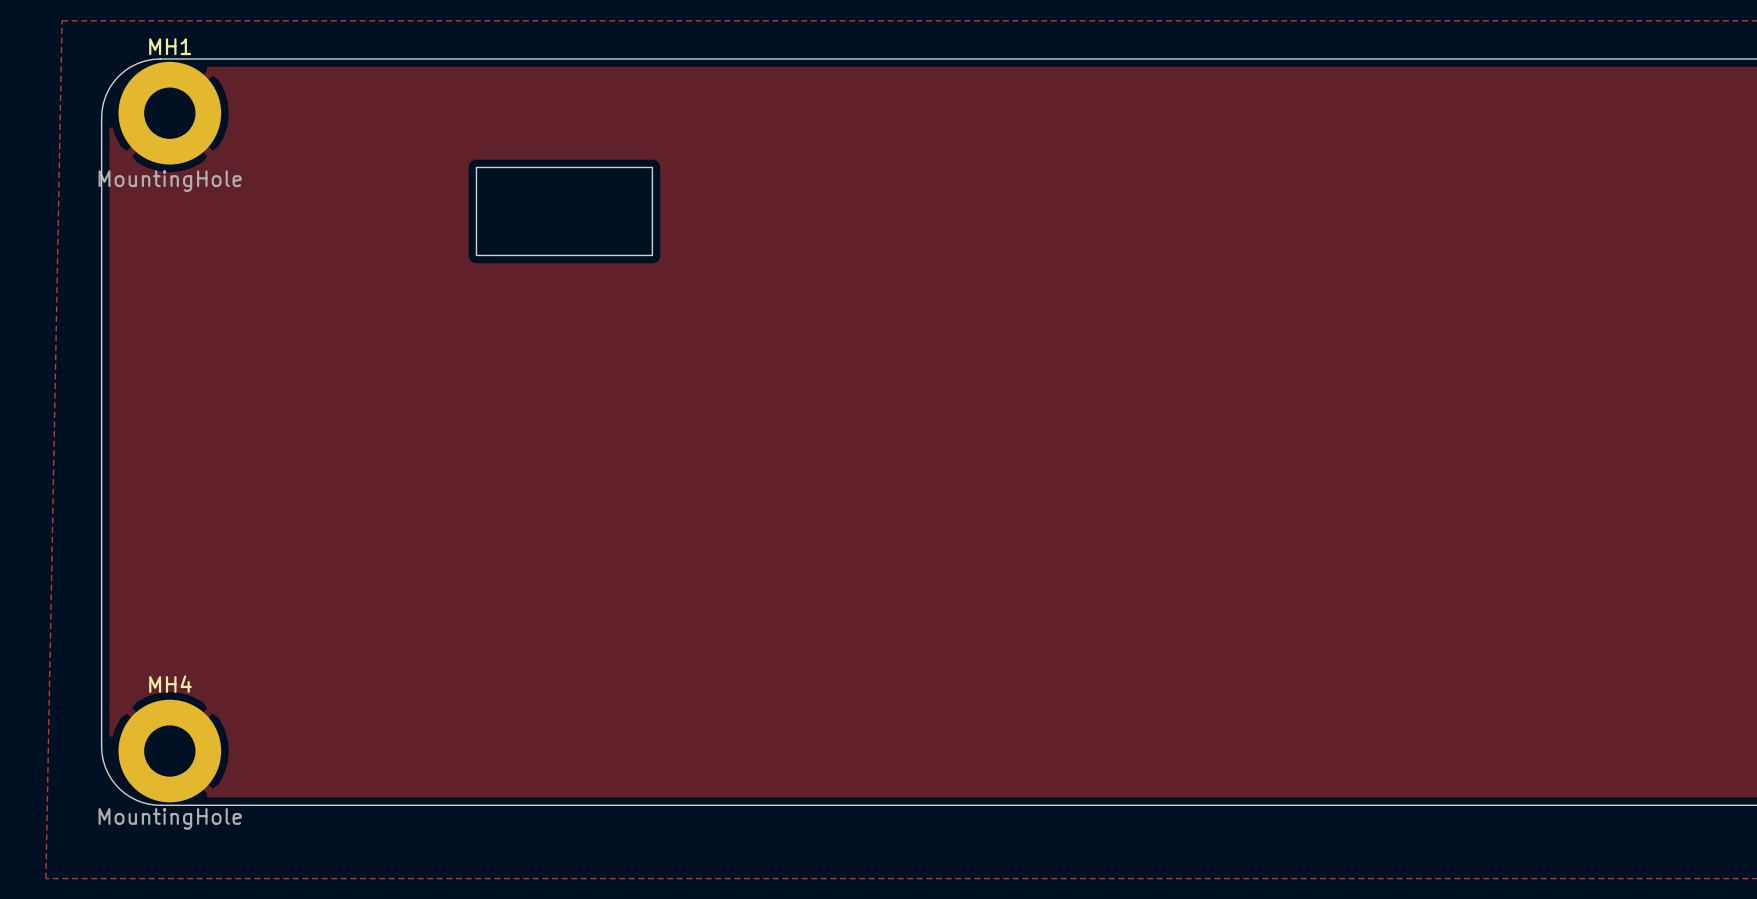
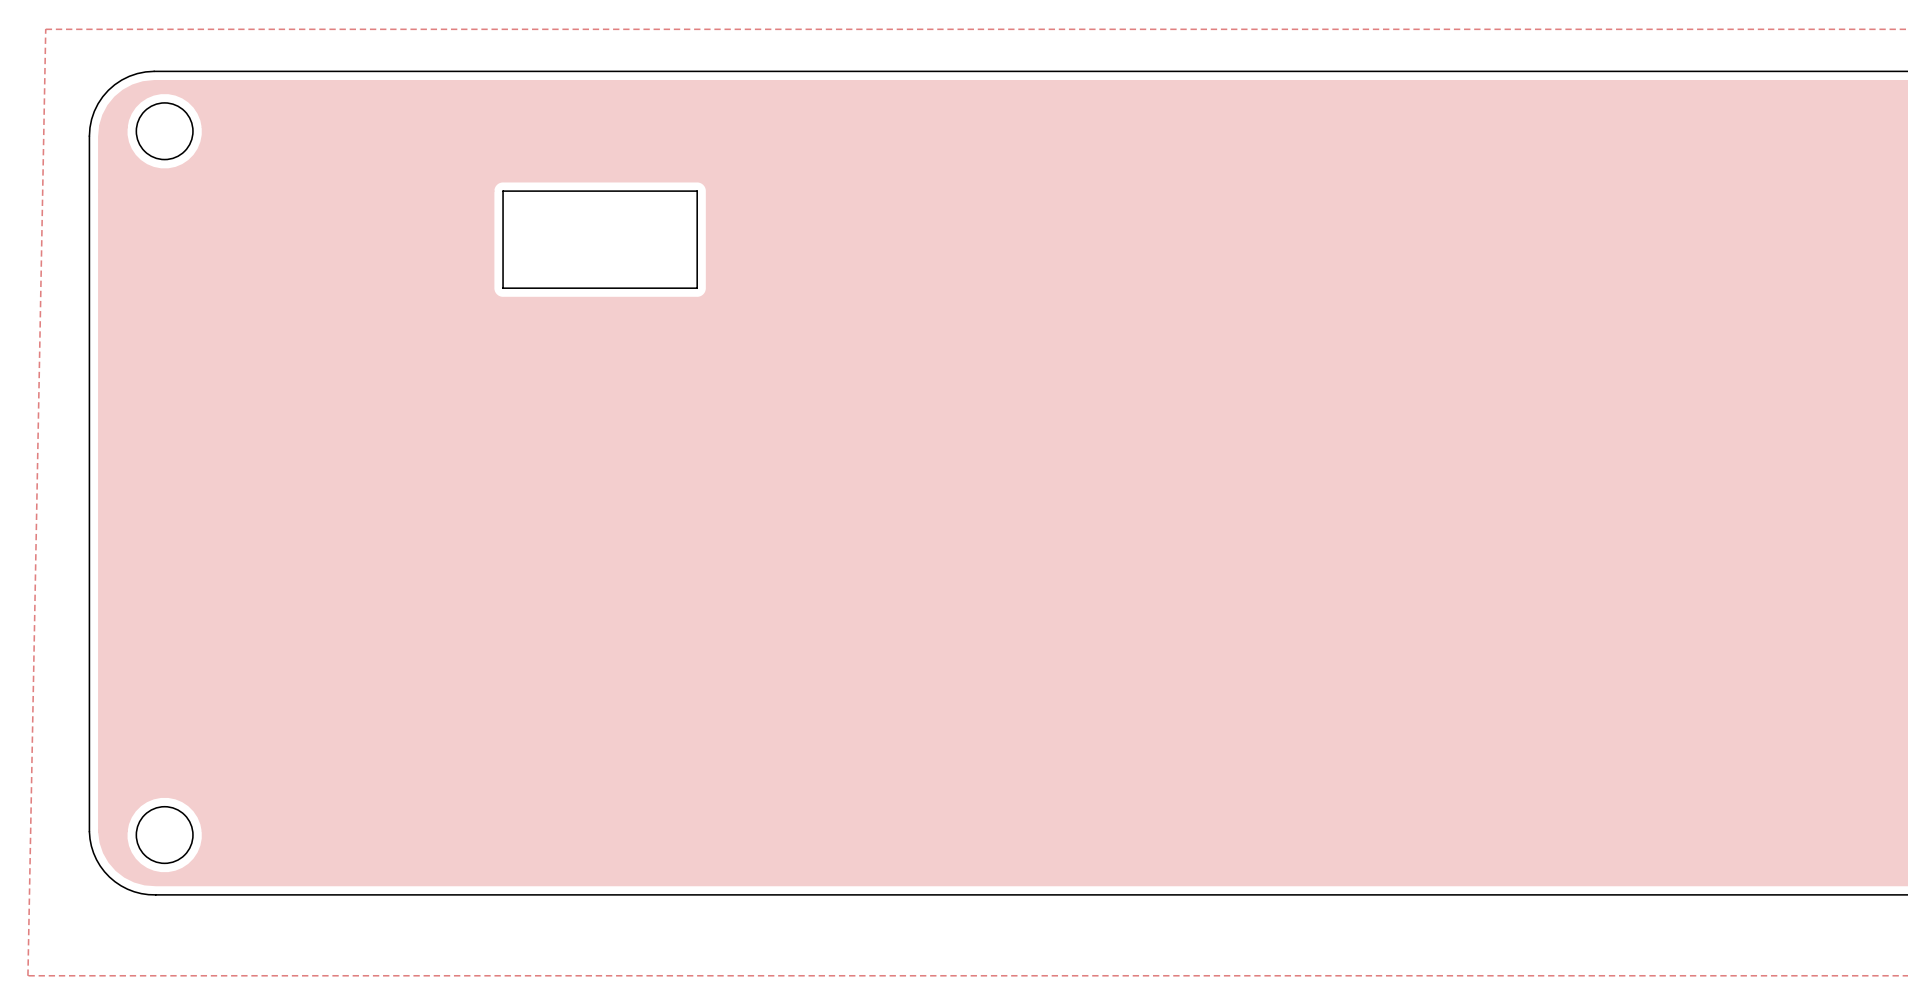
round board edge: none -> [135, 102, 194, 160]
MH1: MountingHole (169, 113) -> none
round board edge: none -> [135, 806, 194, 864]
MH4: MountingHole (169, 751) -> none

